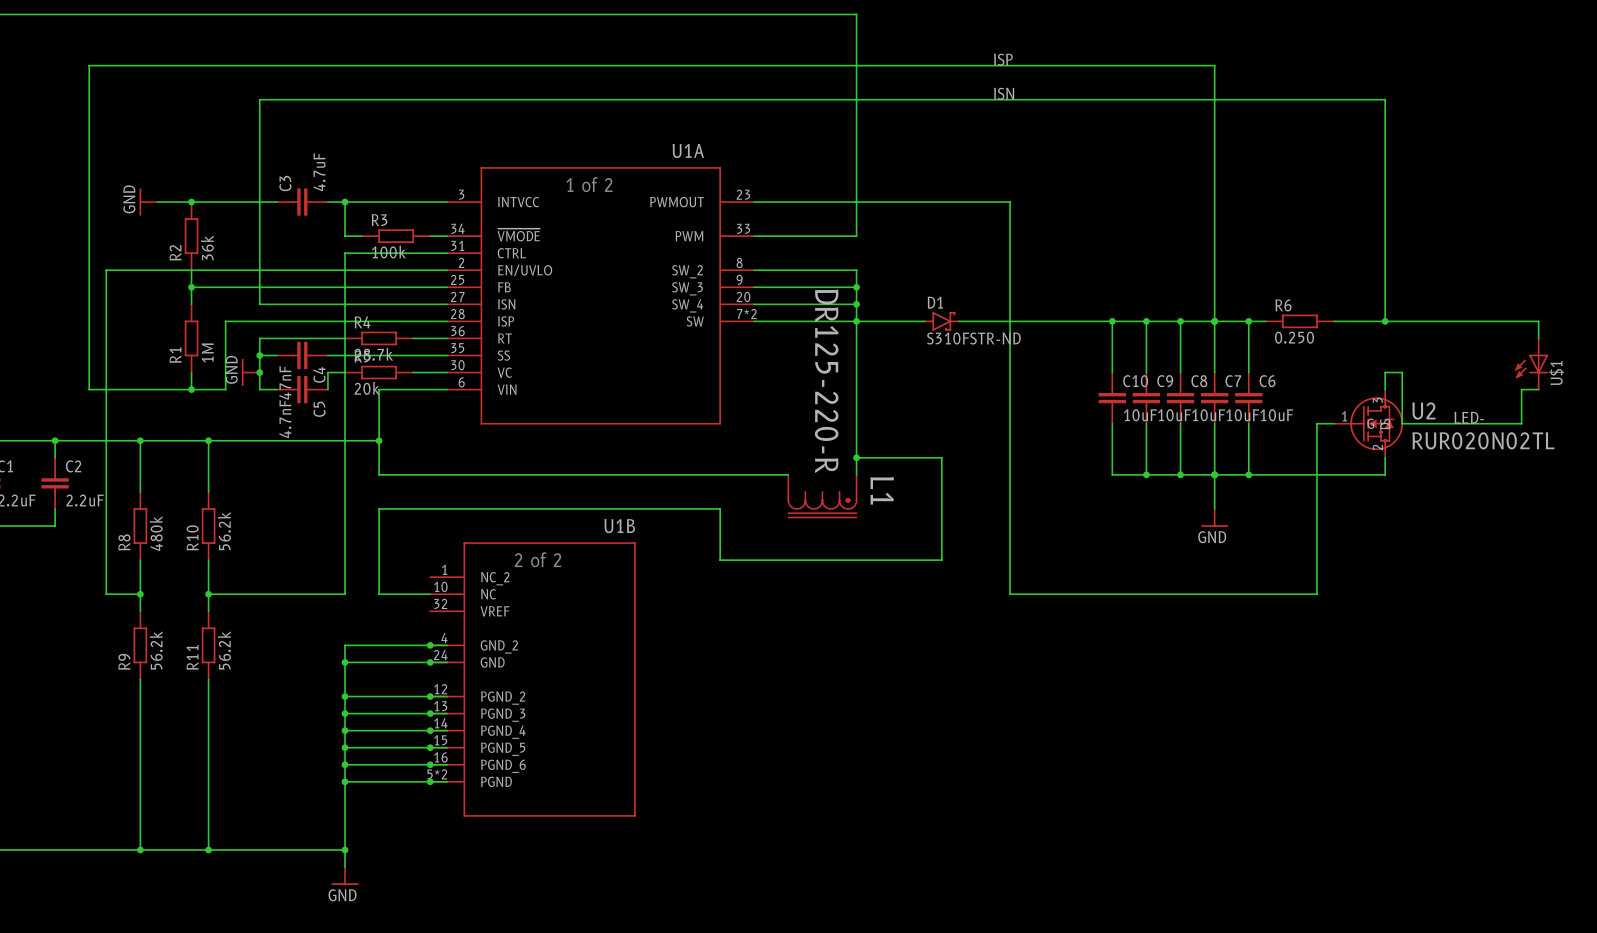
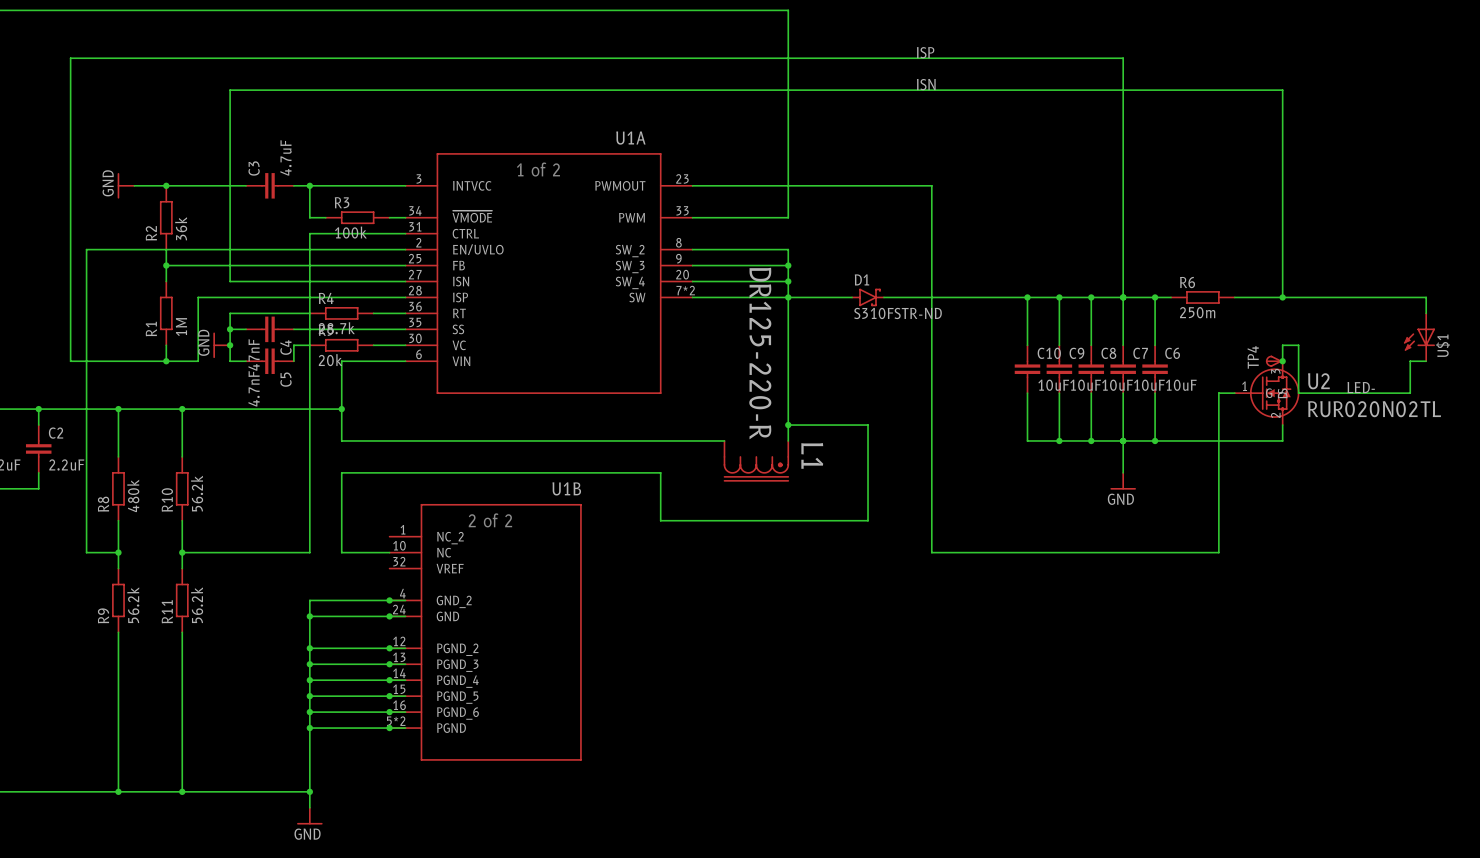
R6 value: 0.250 (1294, 337) -> 250m (1197, 312)
TP4: none -> (1274, 361)
junction: none -> (1282, 361)

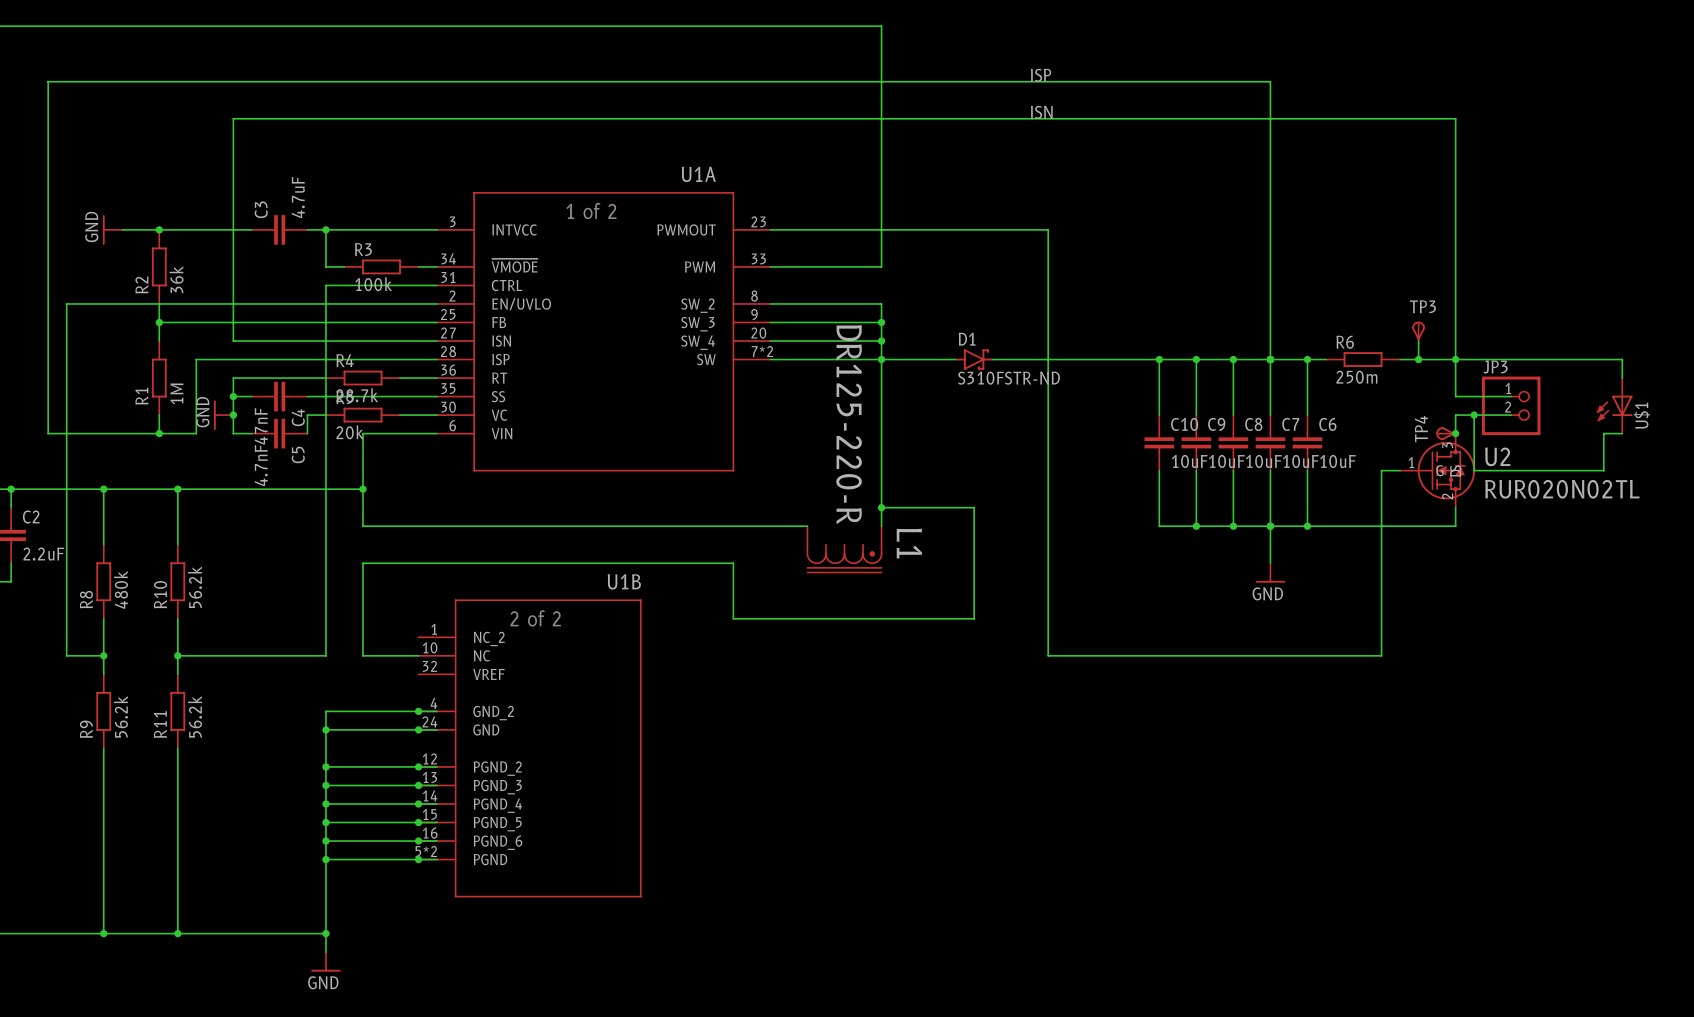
TP3: none -> (1418, 331)
wire: none -> (1418, 341) (1418, 359)
junction: none -> (1418, 359)
wire: none -> (1455, 359) (1455, 396) (1511, 396)
JP3: none -> (1511, 405)
wire: none -> (1474, 415) (1511, 415)
junction: none -> (1474, 415)
label: LED- (1361, 387) -> none

